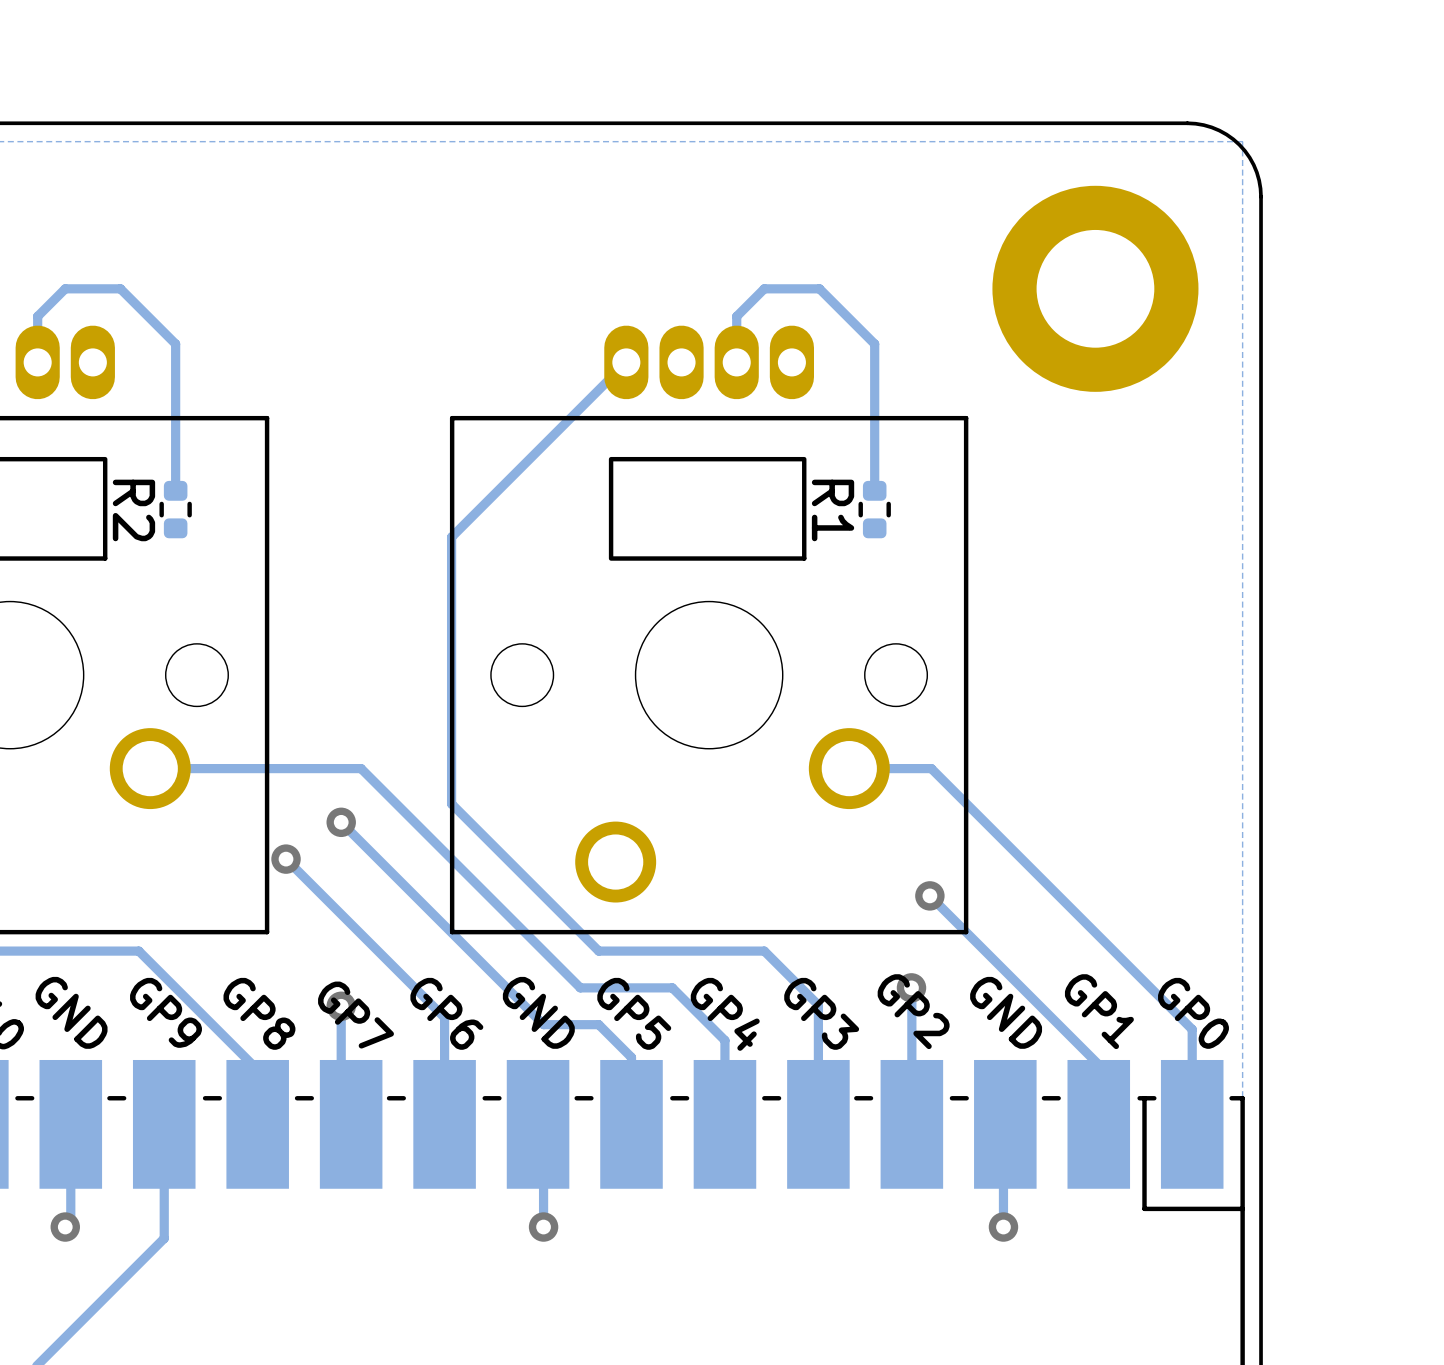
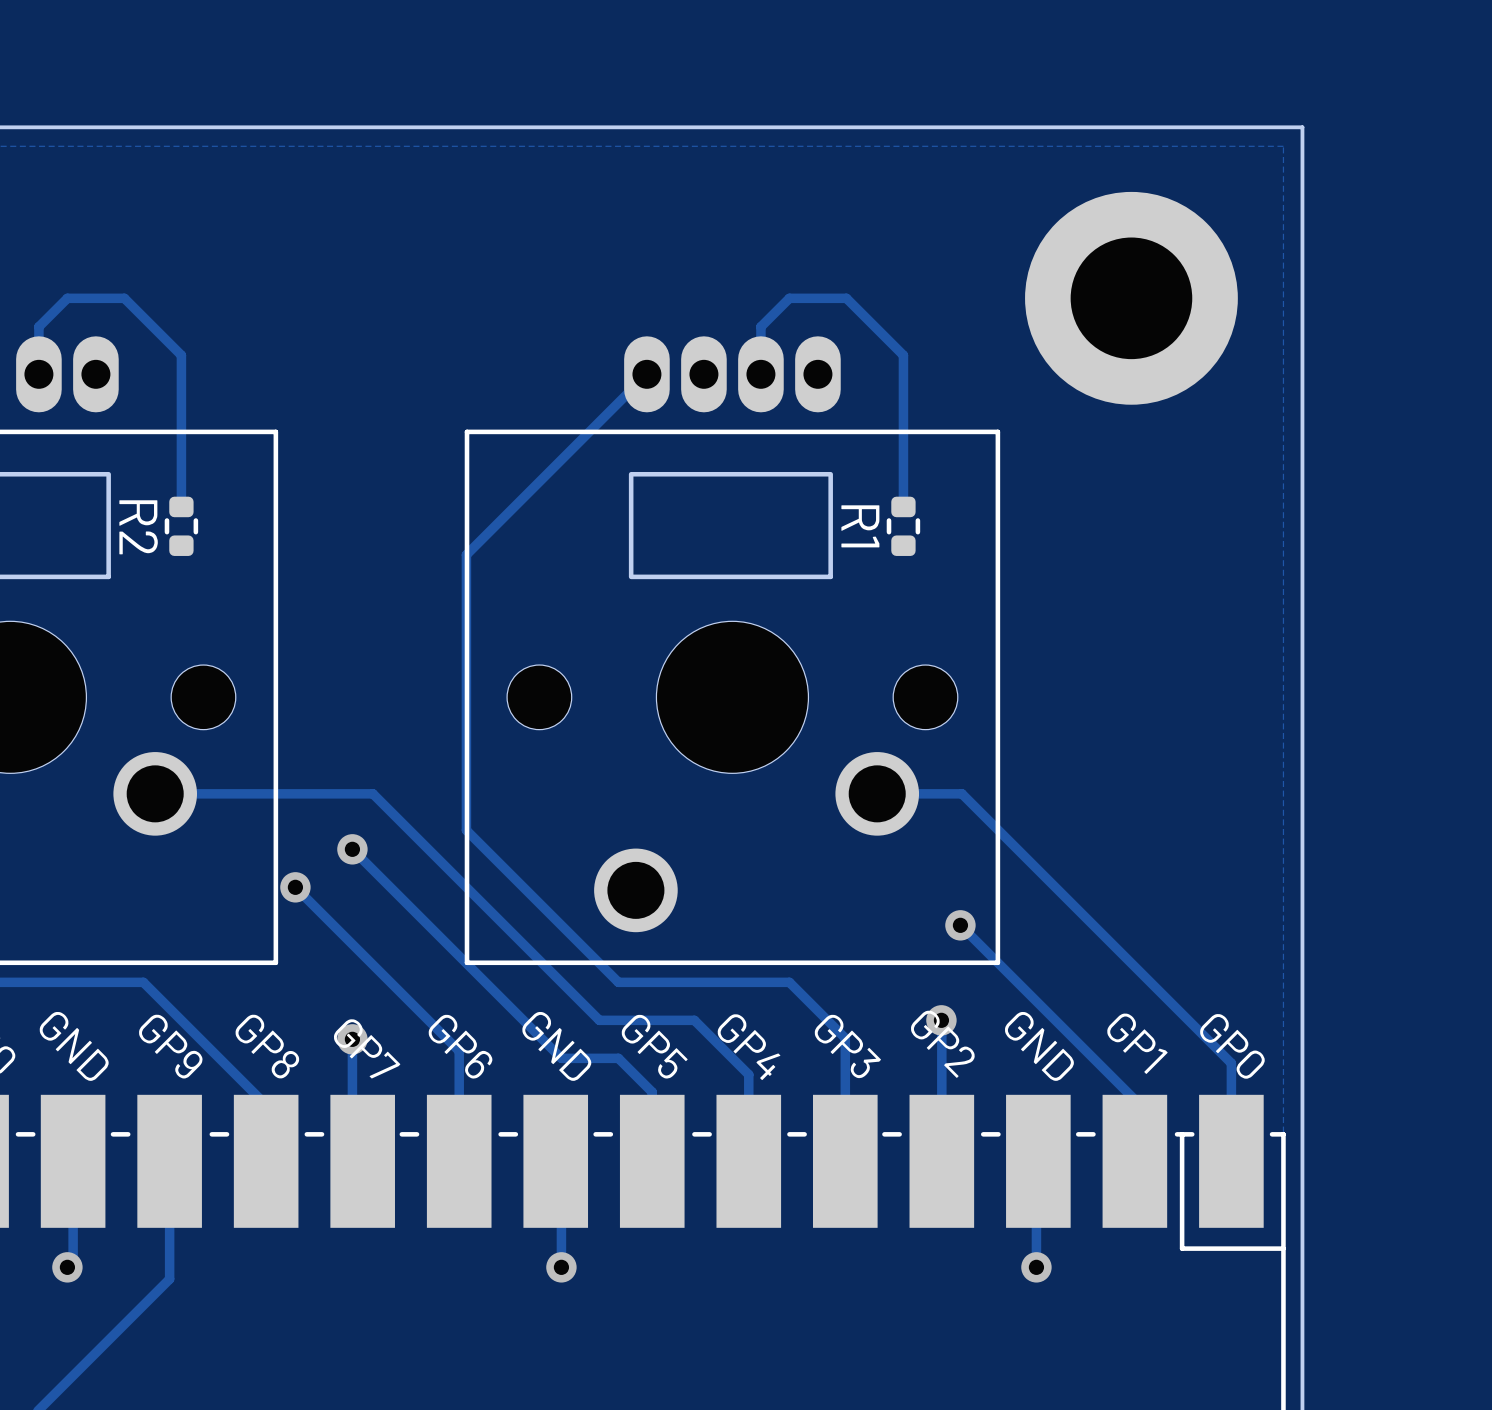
board edge: (1187, 123) (1211, 127) (1226, 134) (1239, 144) (1253, 164) (1259, 180) (1261, 196) -> (1226, 127) (1302, 127) (1302, 203)

